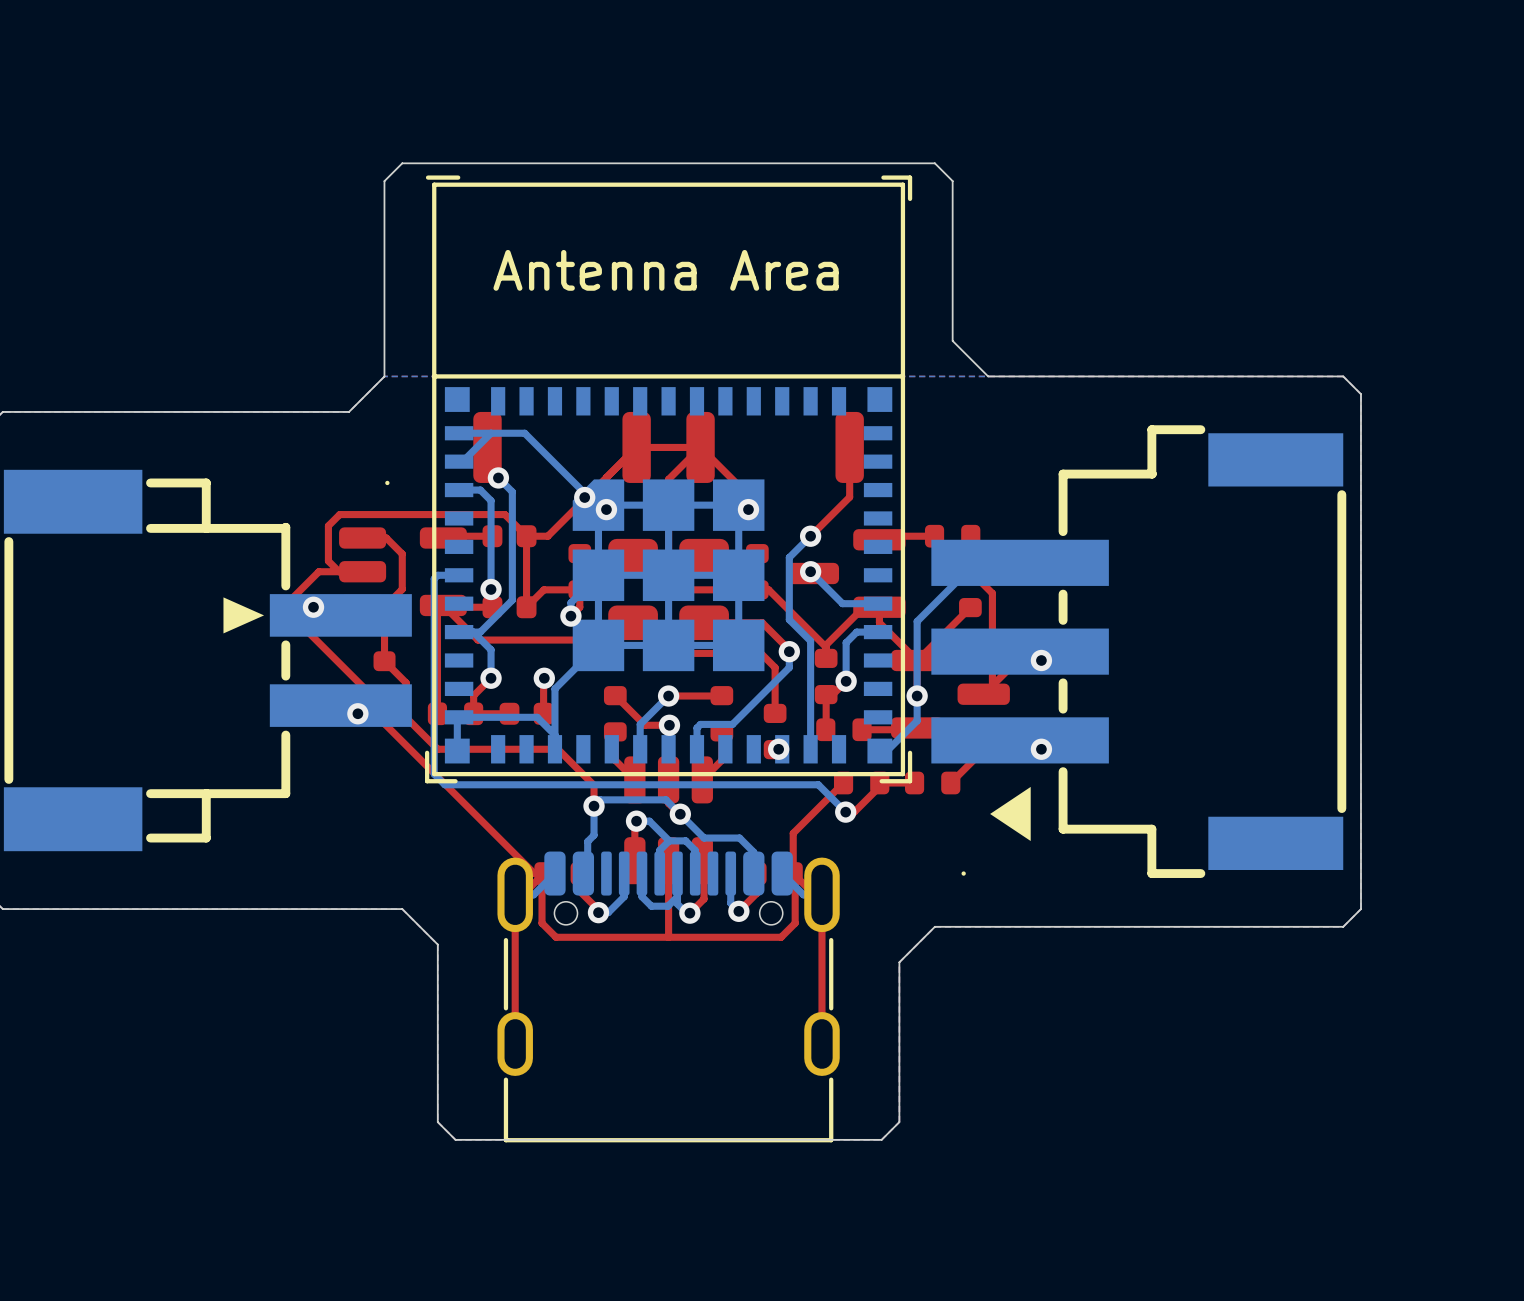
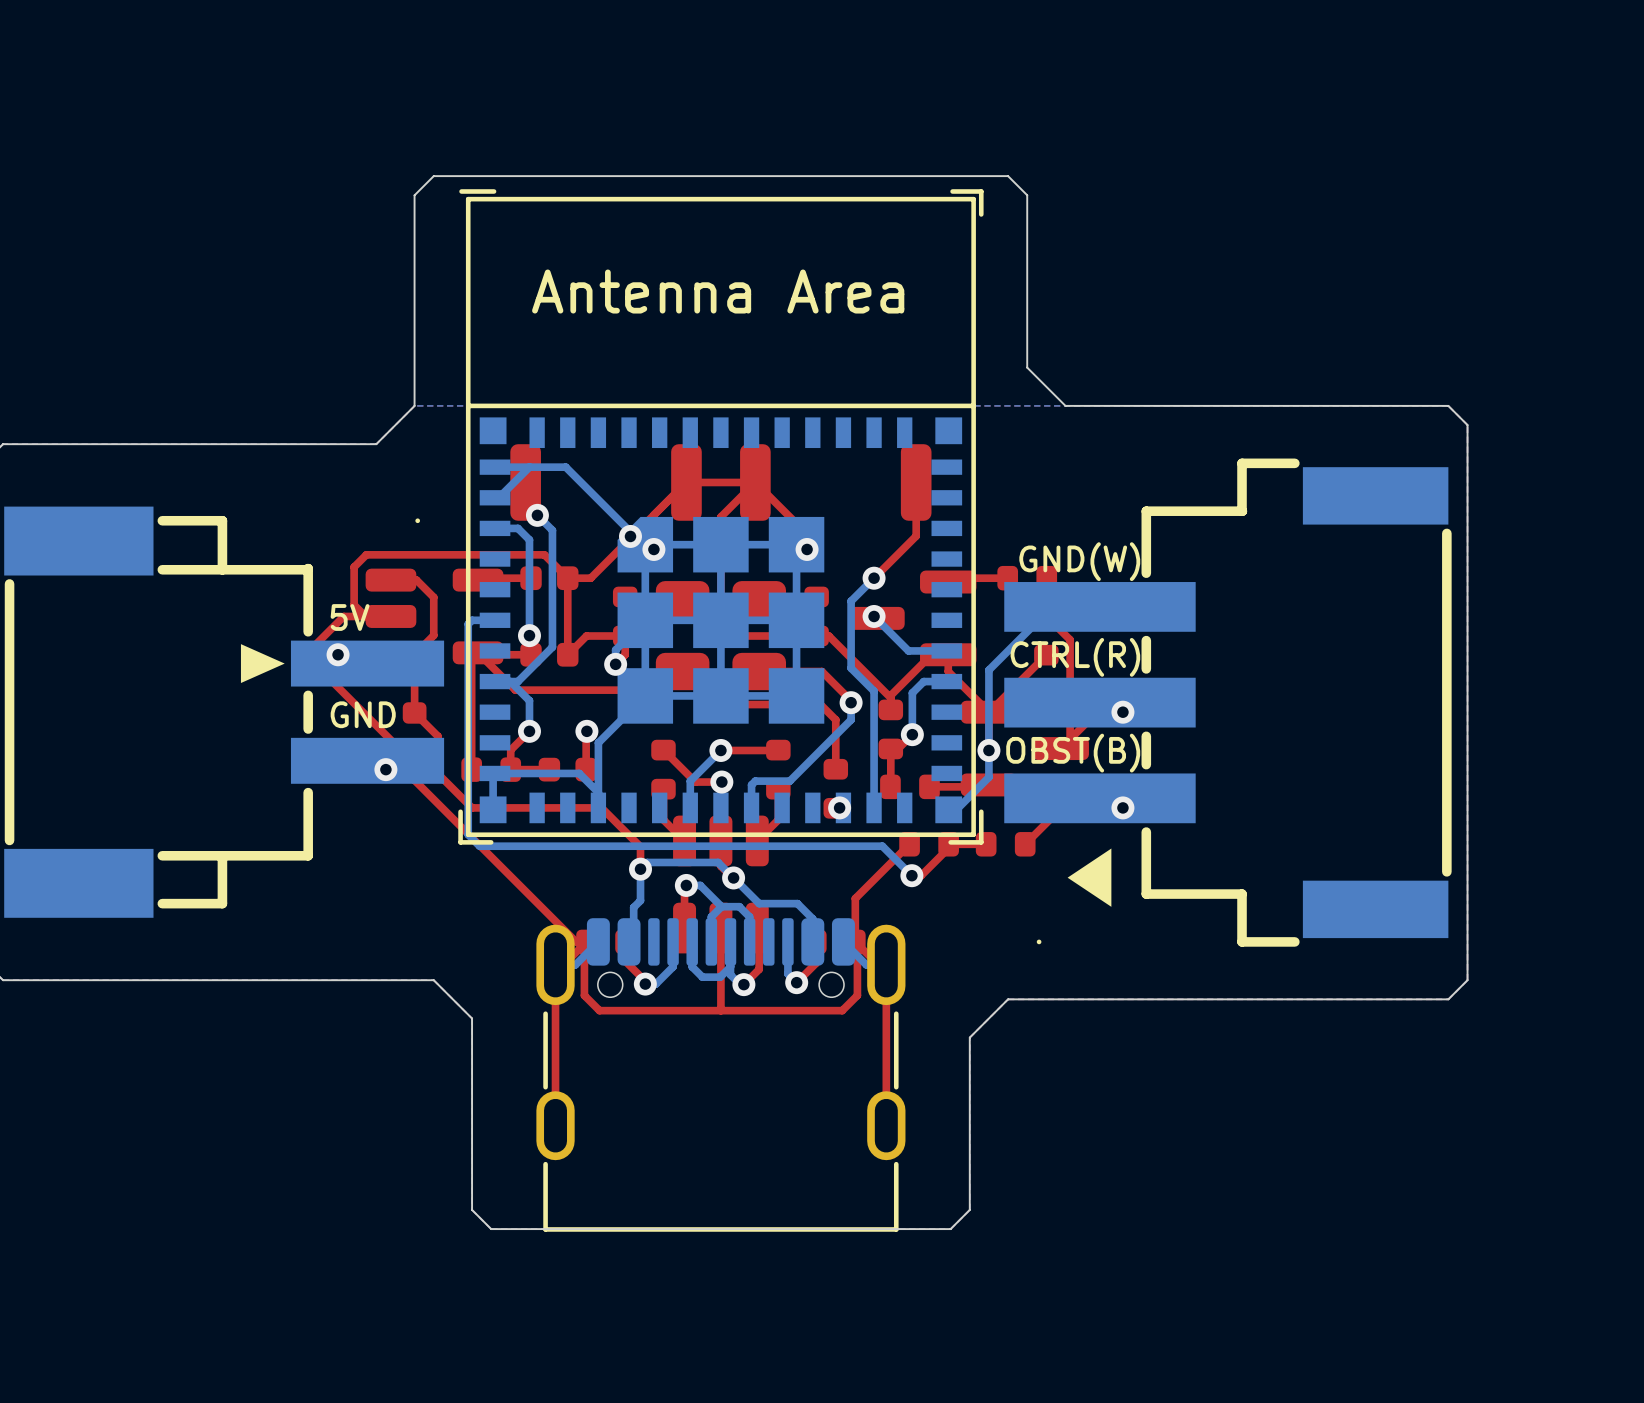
text: none -> GND(W) (1079, 561)
text: none -> 5V (350, 617)
text: none -> CTRL(R) (1075, 657)
text: none -> GND (363, 714)
text: none -> OBST(B) (1073, 753)

